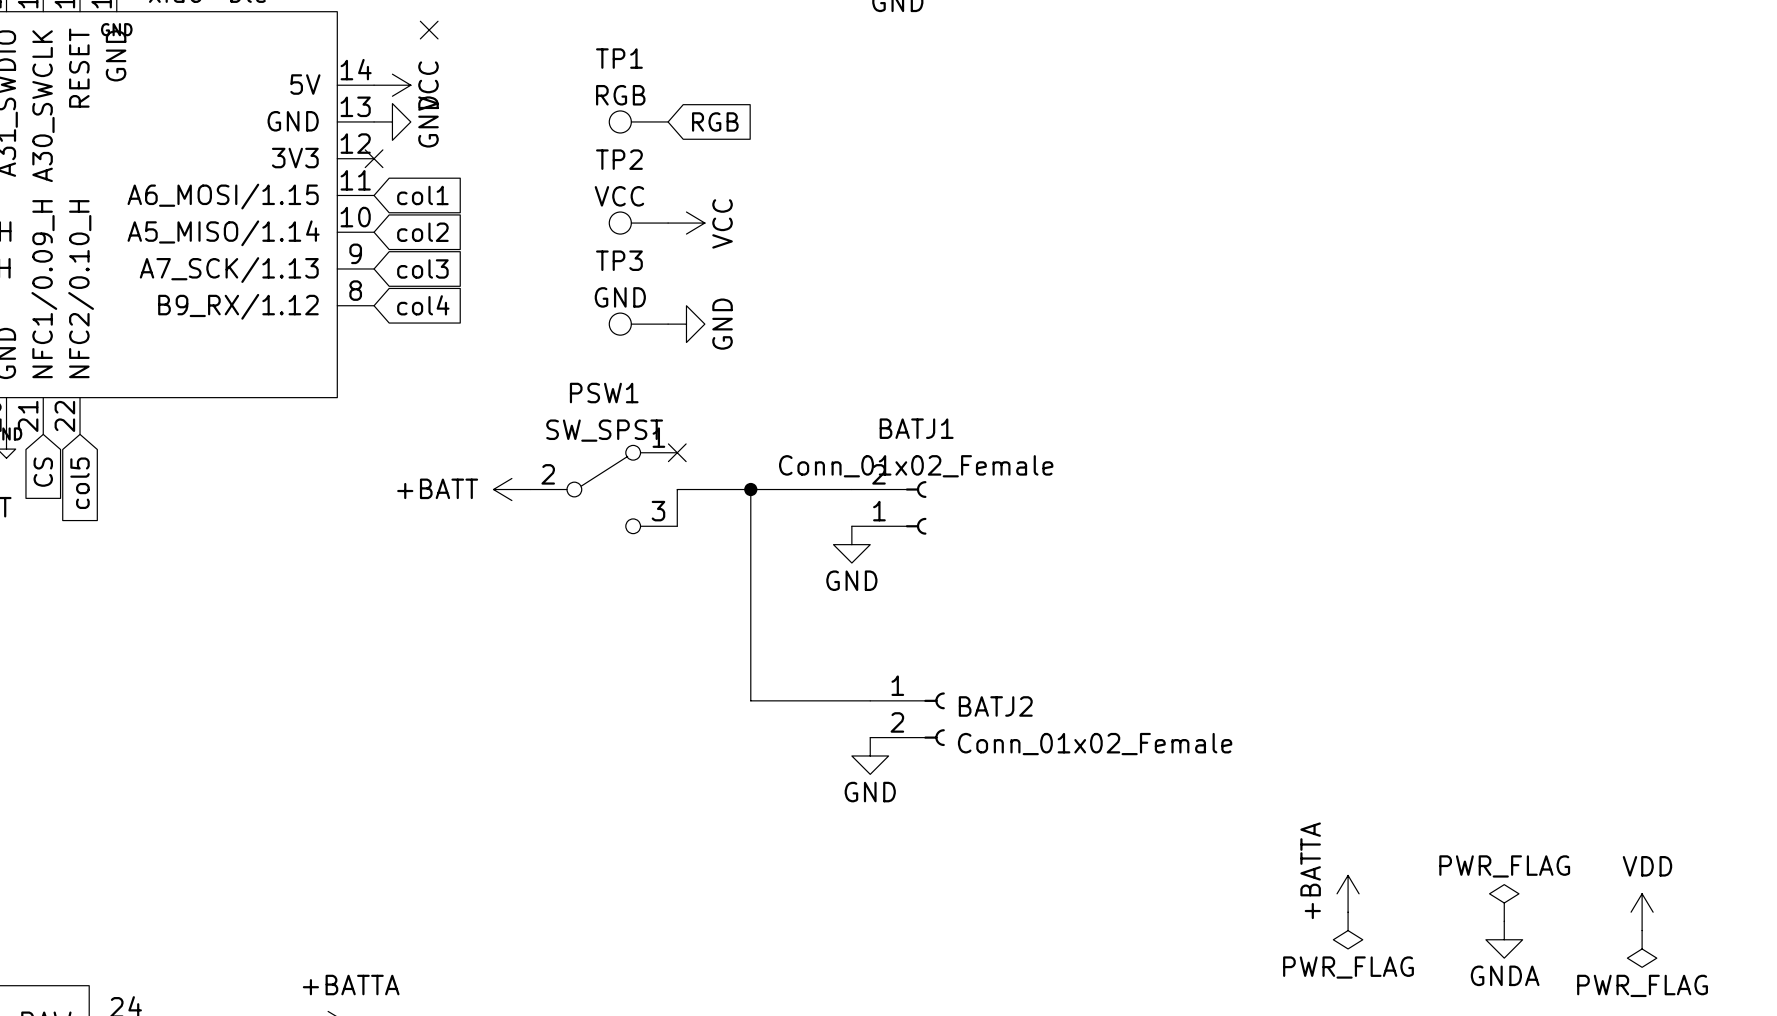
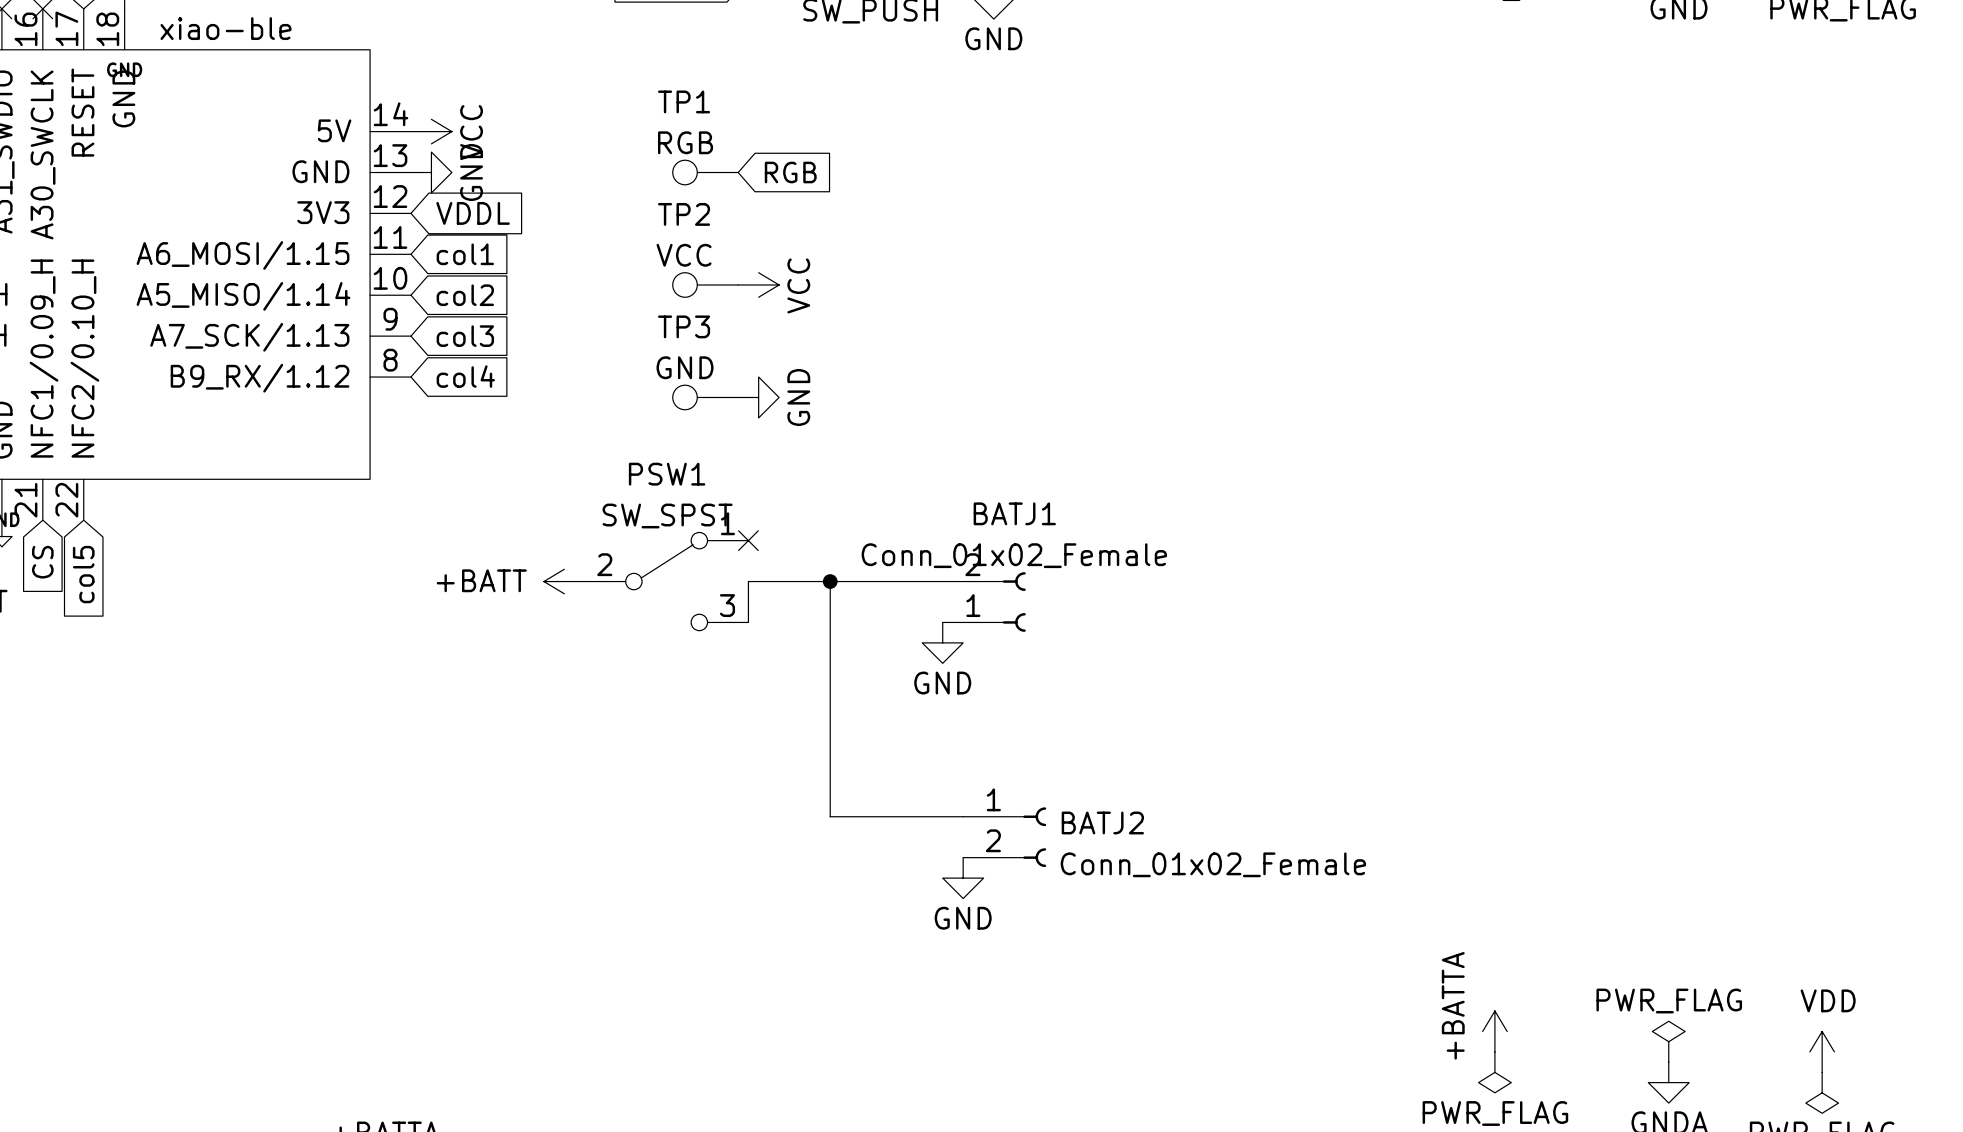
no-connect mark: (429, 30) -> none
no-connect mark: (374, 158) -> none
global label: none -> VDDL (473, 213)

